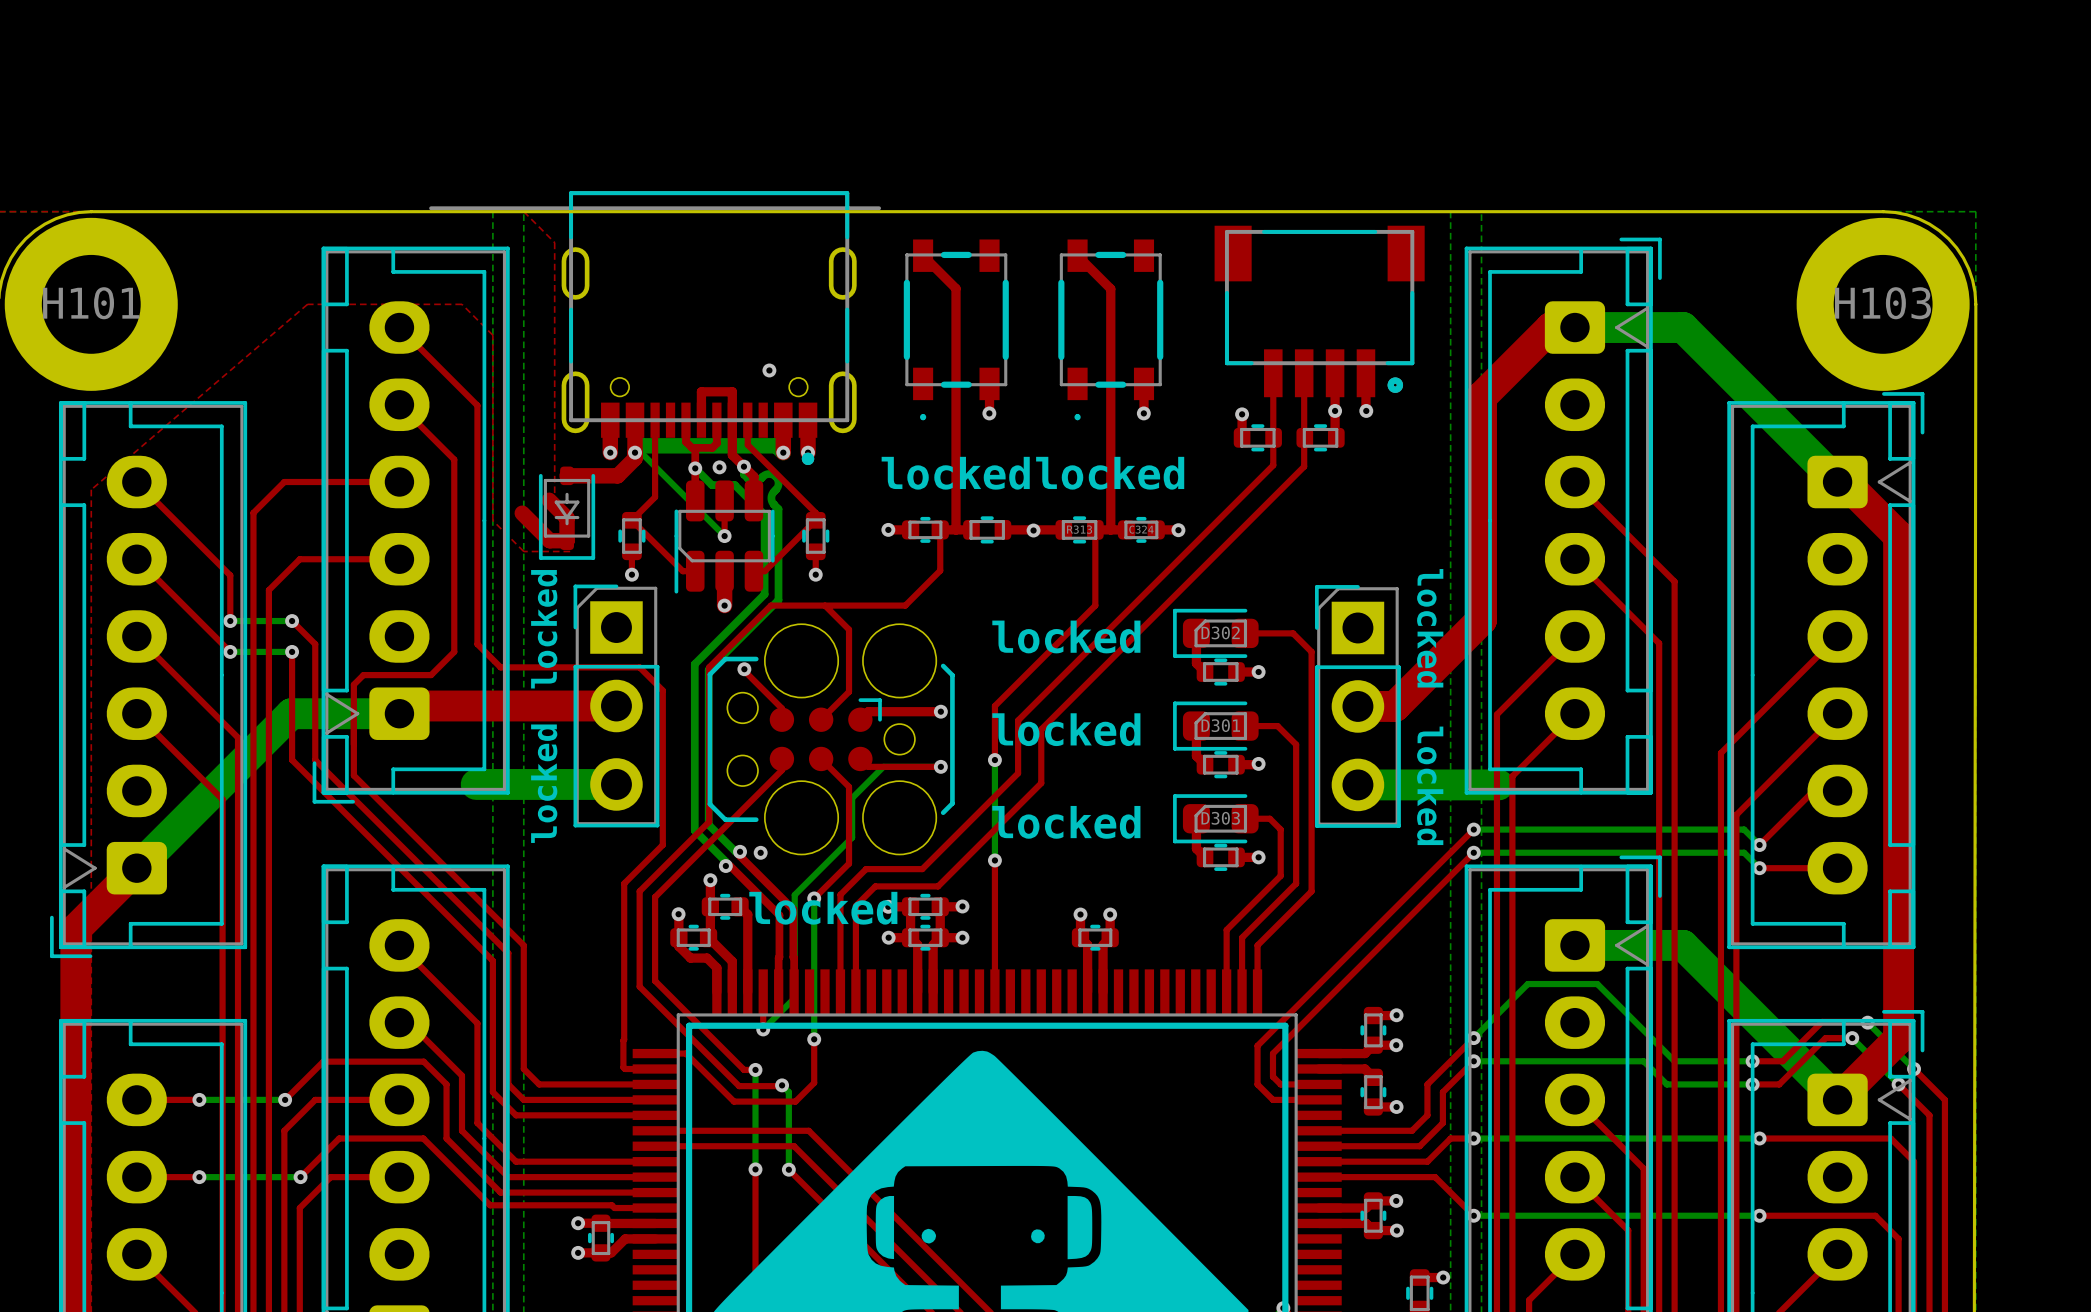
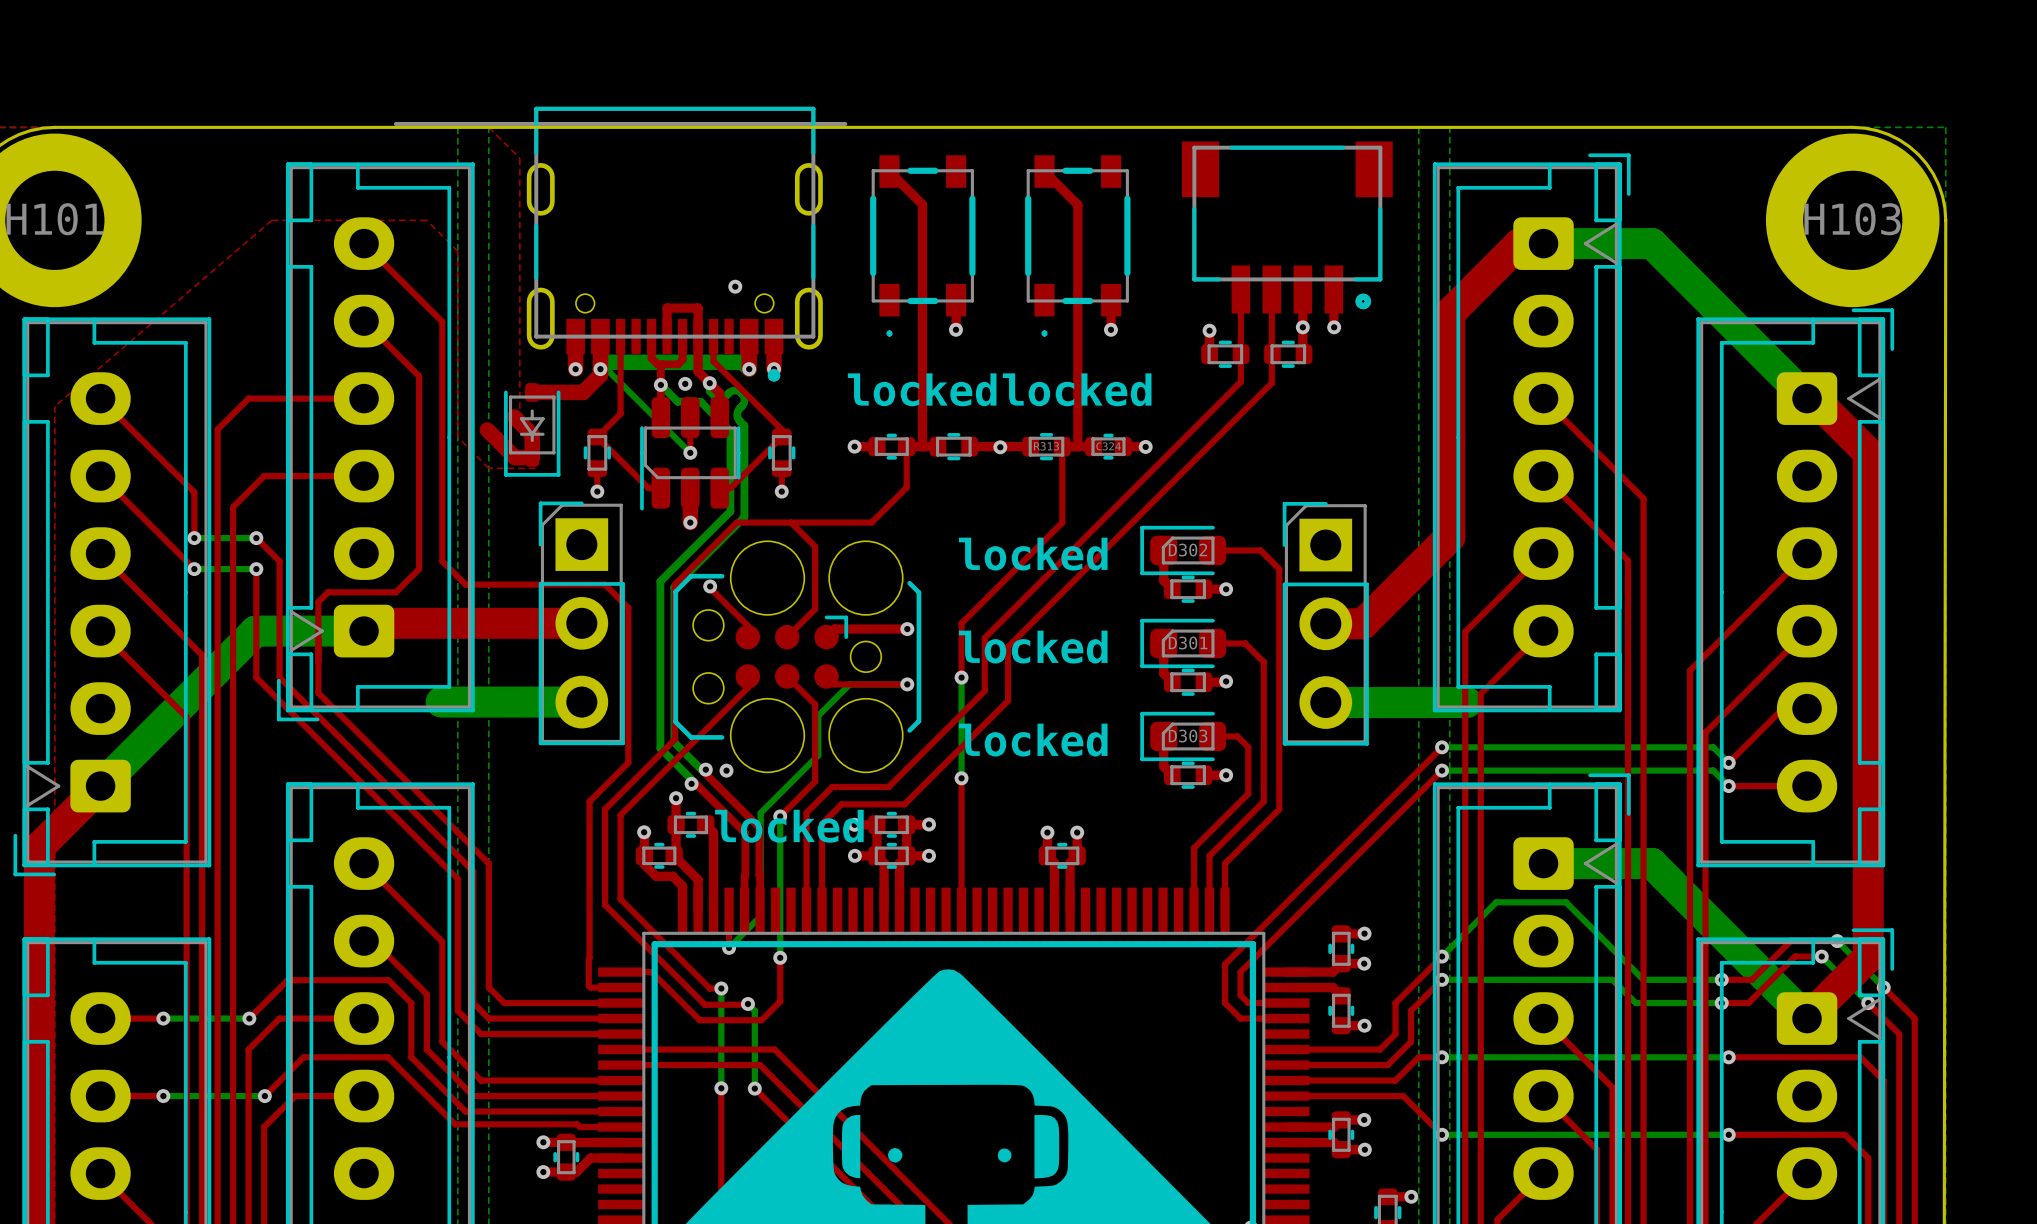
text: locked (1430, 628) -> none
text: locked (544, 629) -> none
text: locked (544, 783) -> none
text: locked (1430, 785) -> none

